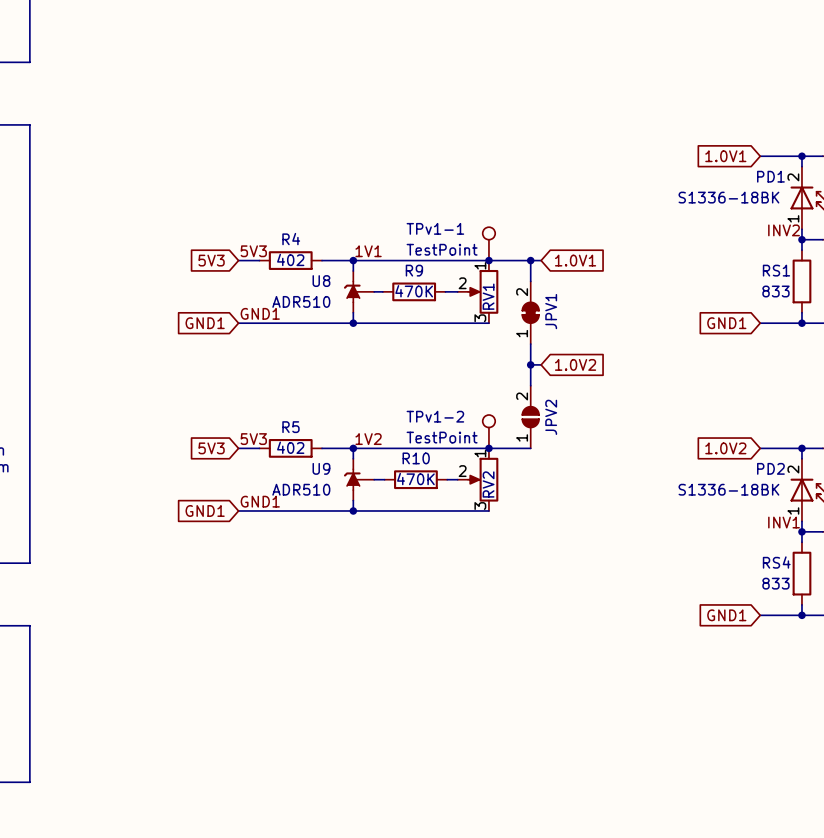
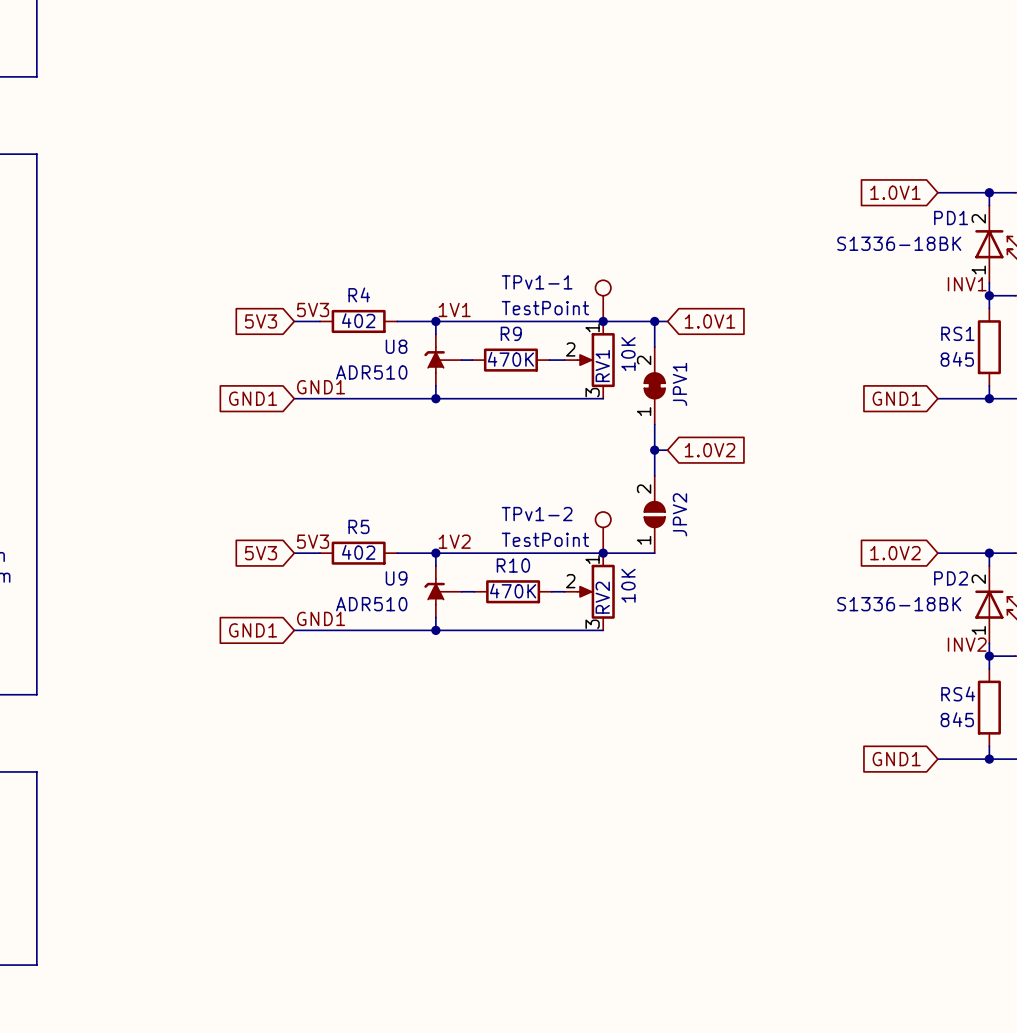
label: INV2 (784, 230) -> INV1 (967, 284)
RV1 value: none -> 10K (628, 354)
RS1 value: 833 (775, 291) -> 845 (957, 359)
RV2 value: none -> 10K (628, 585)
label: INV1 (784, 522) -> INV2 (967, 644)
RS4 value: 833 (775, 583) -> 845 (957, 719)

